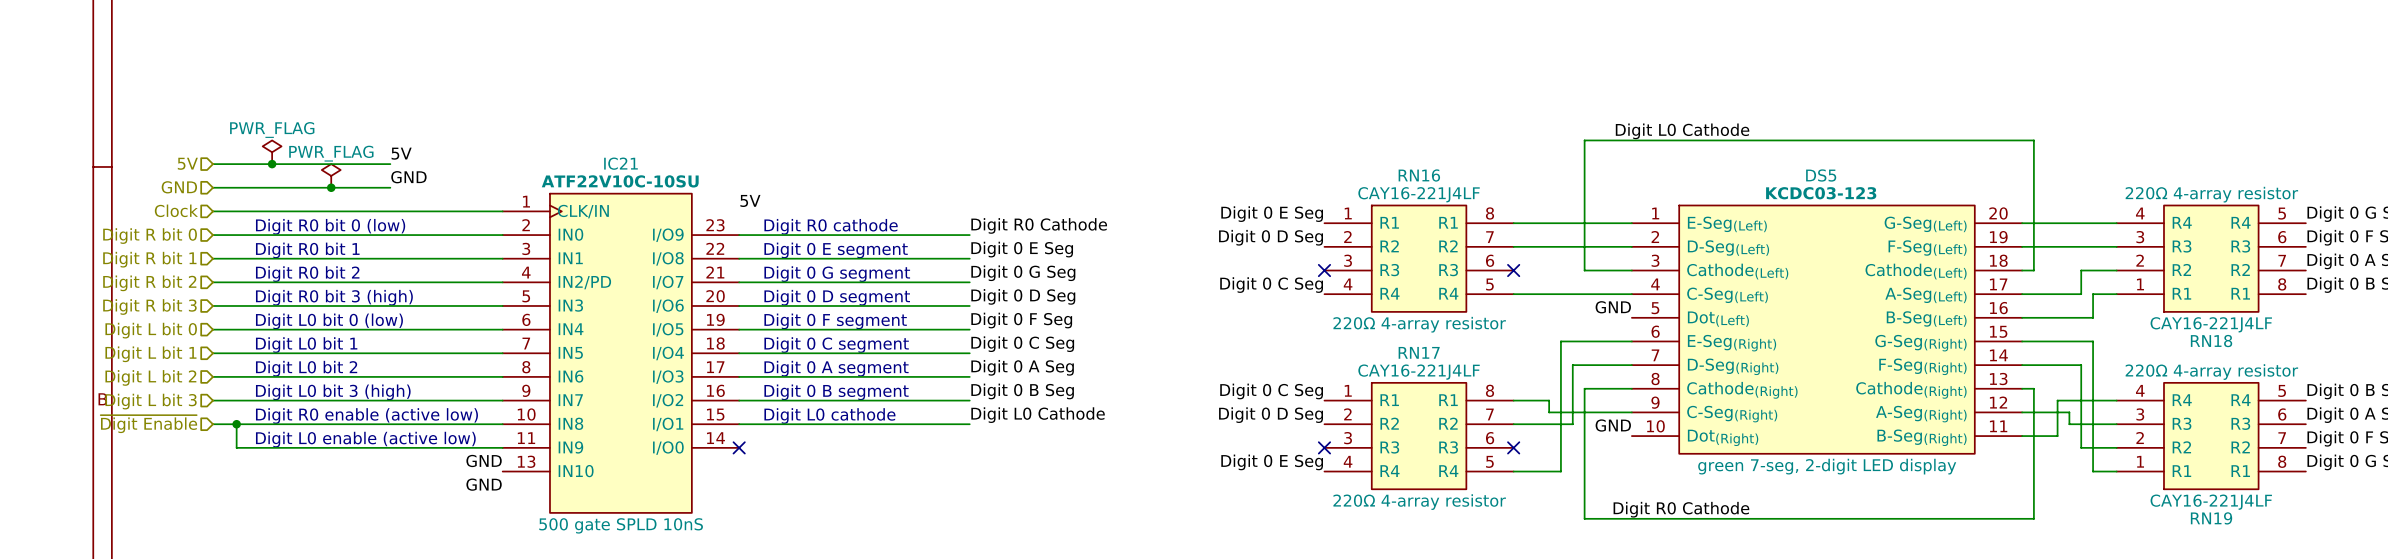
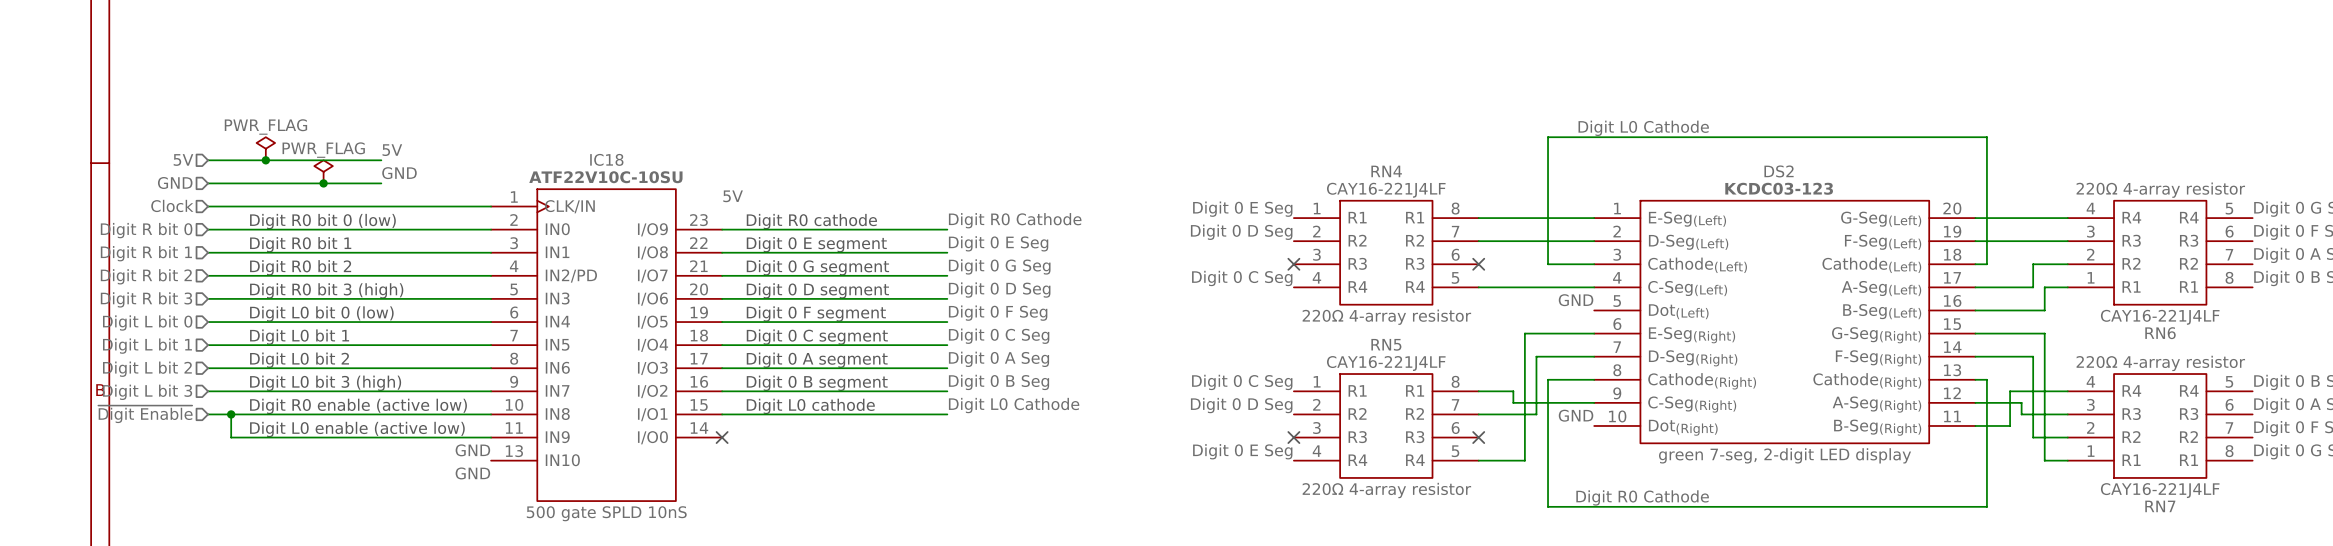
IC21 name: IC21 (620, 163) -> IC18 (606, 159)
RN16 name: RN16 (1419, 175) -> RN4 (1386, 171)
DS5 name: DS5 (1821, 175) -> DS2 (1779, 171)
RN18 name: RN18 (2211, 341) -> RN6 (2160, 333)
RN17 name: RN17 (1419, 352) -> RN5 (1386, 344)
RN19 name: RN19 (2211, 518) -> RN7 (2160, 506)

